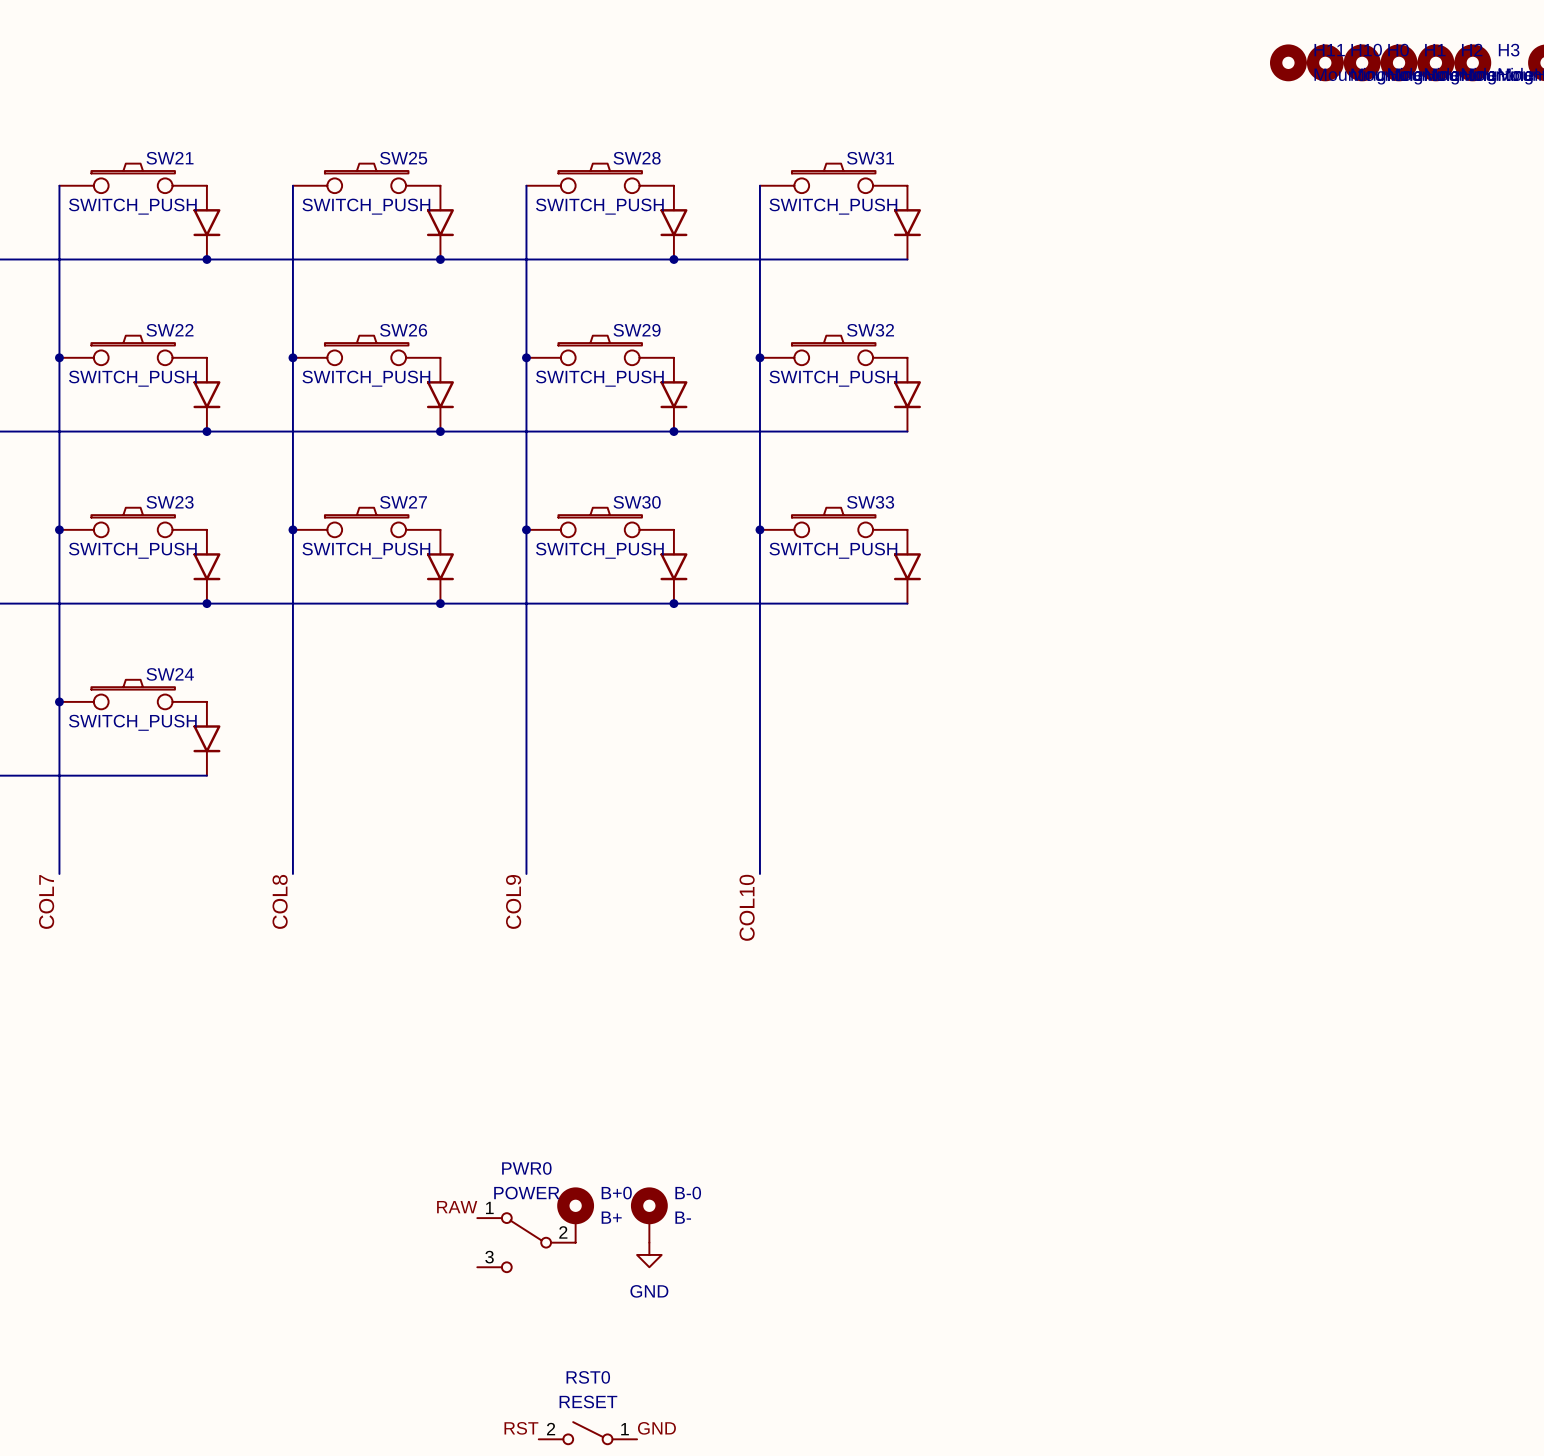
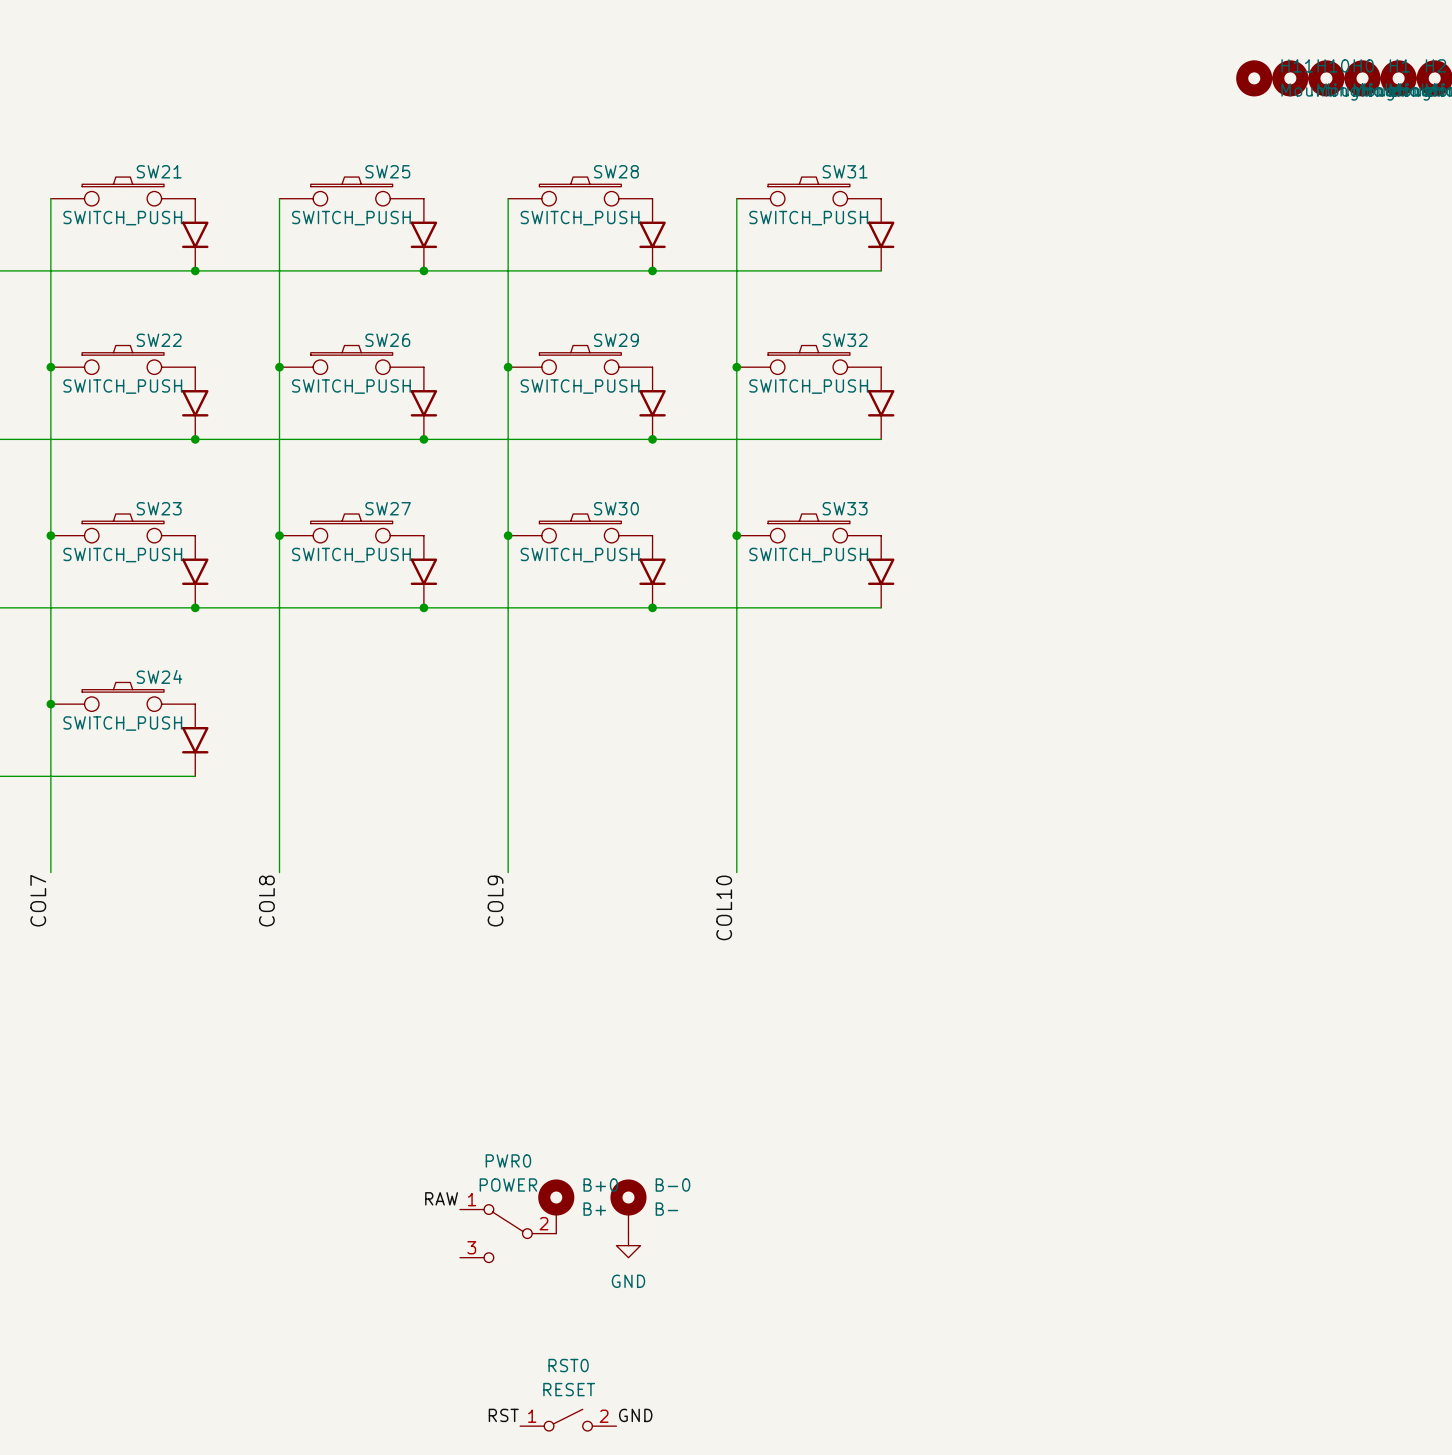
RST0 flip: as is (587, 1433) -> left-right (568, 1420)

